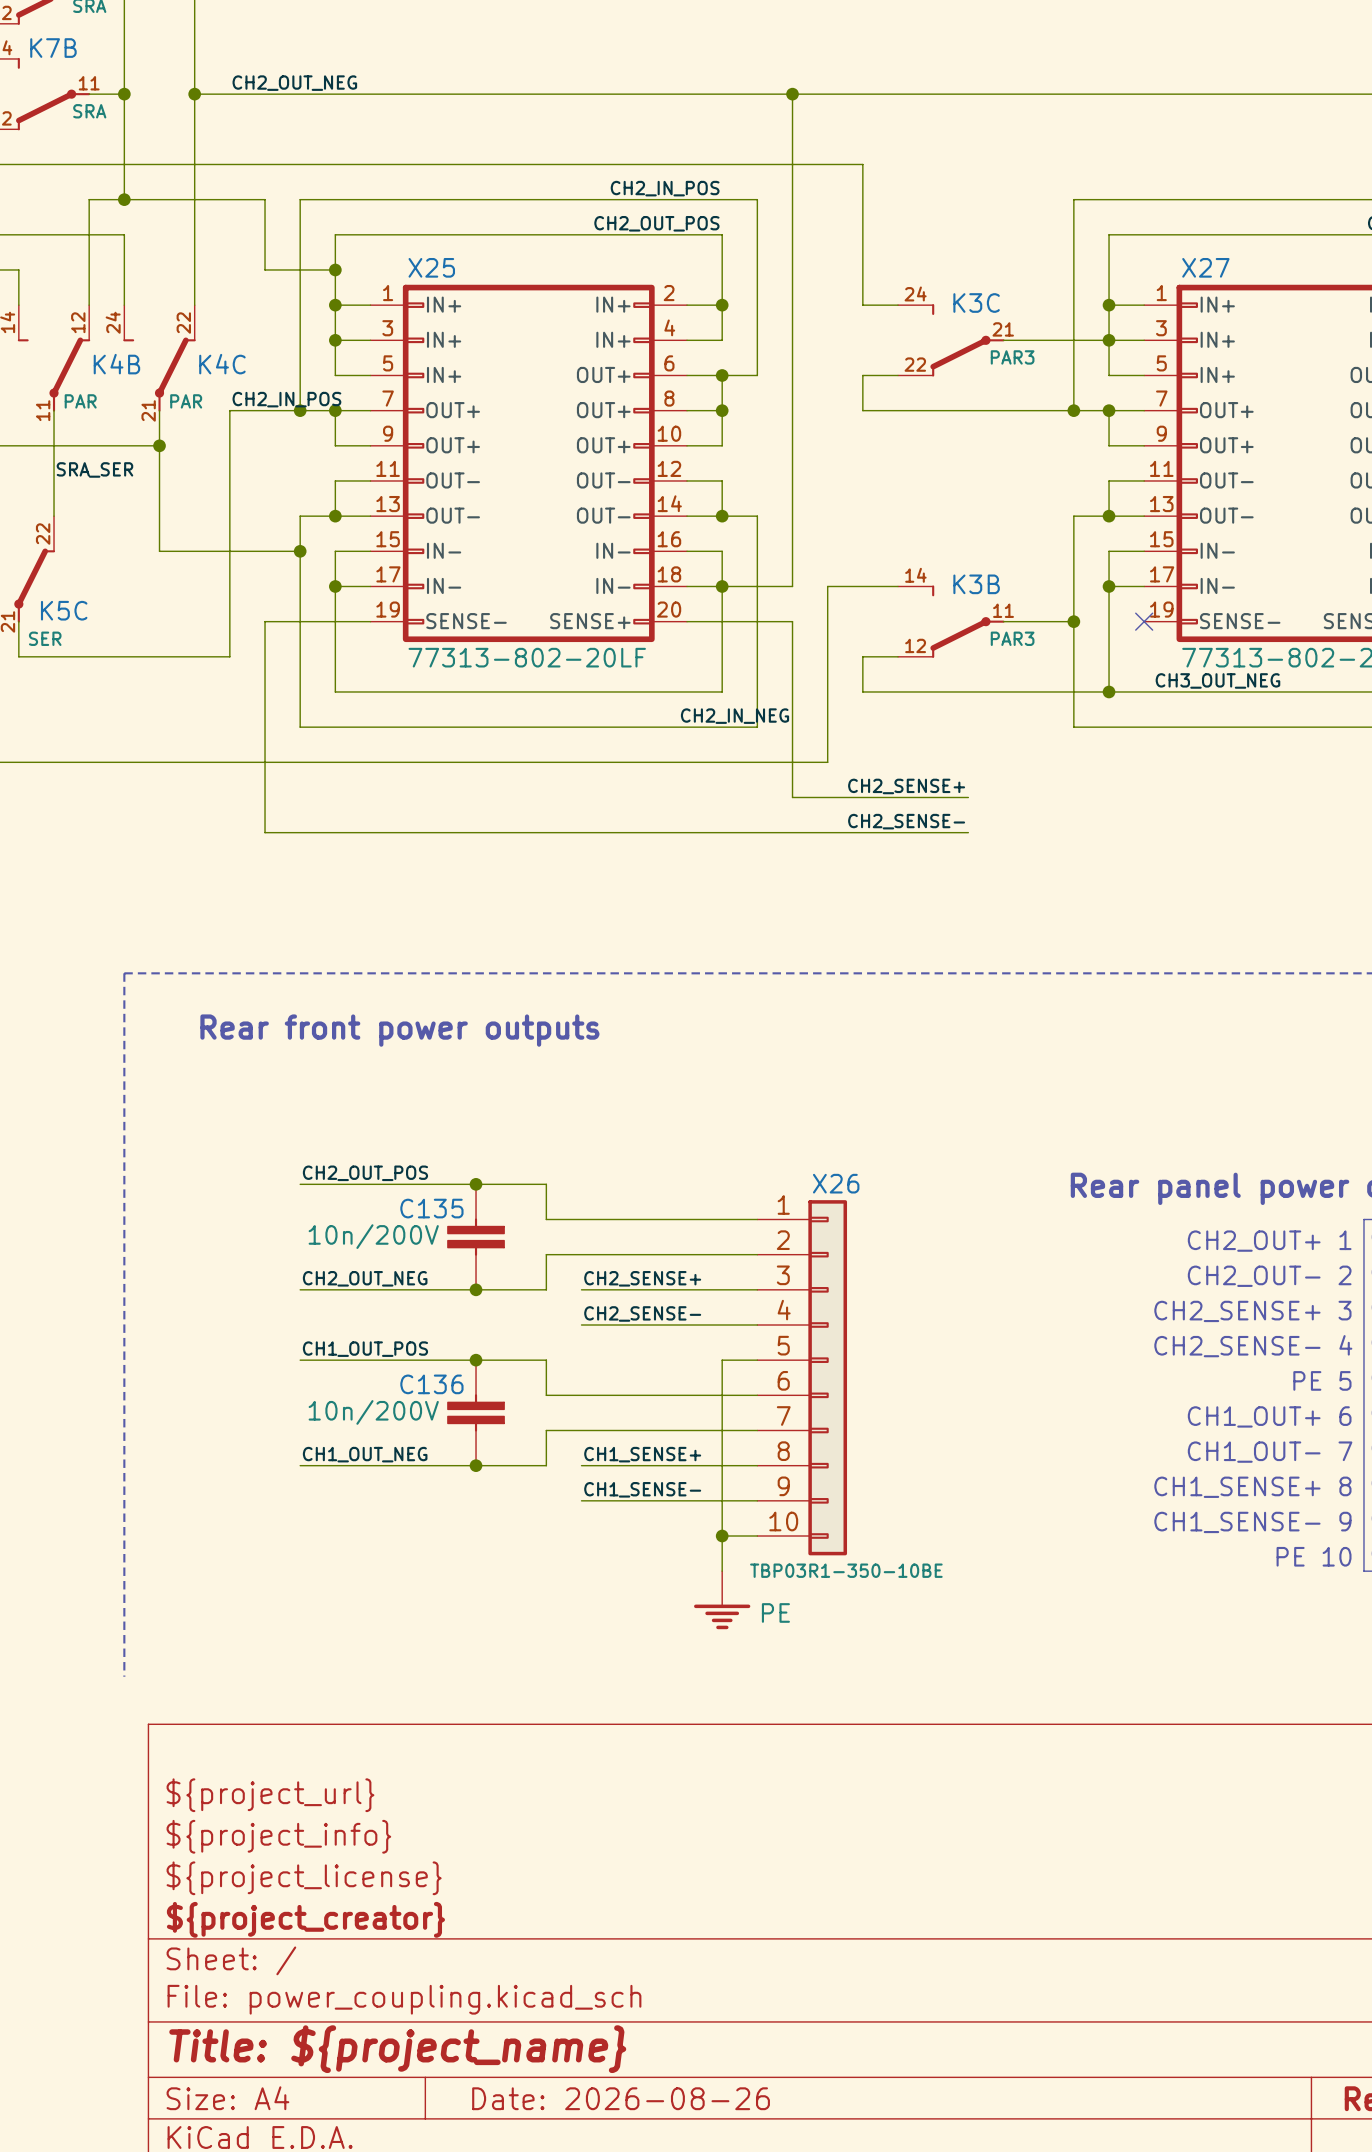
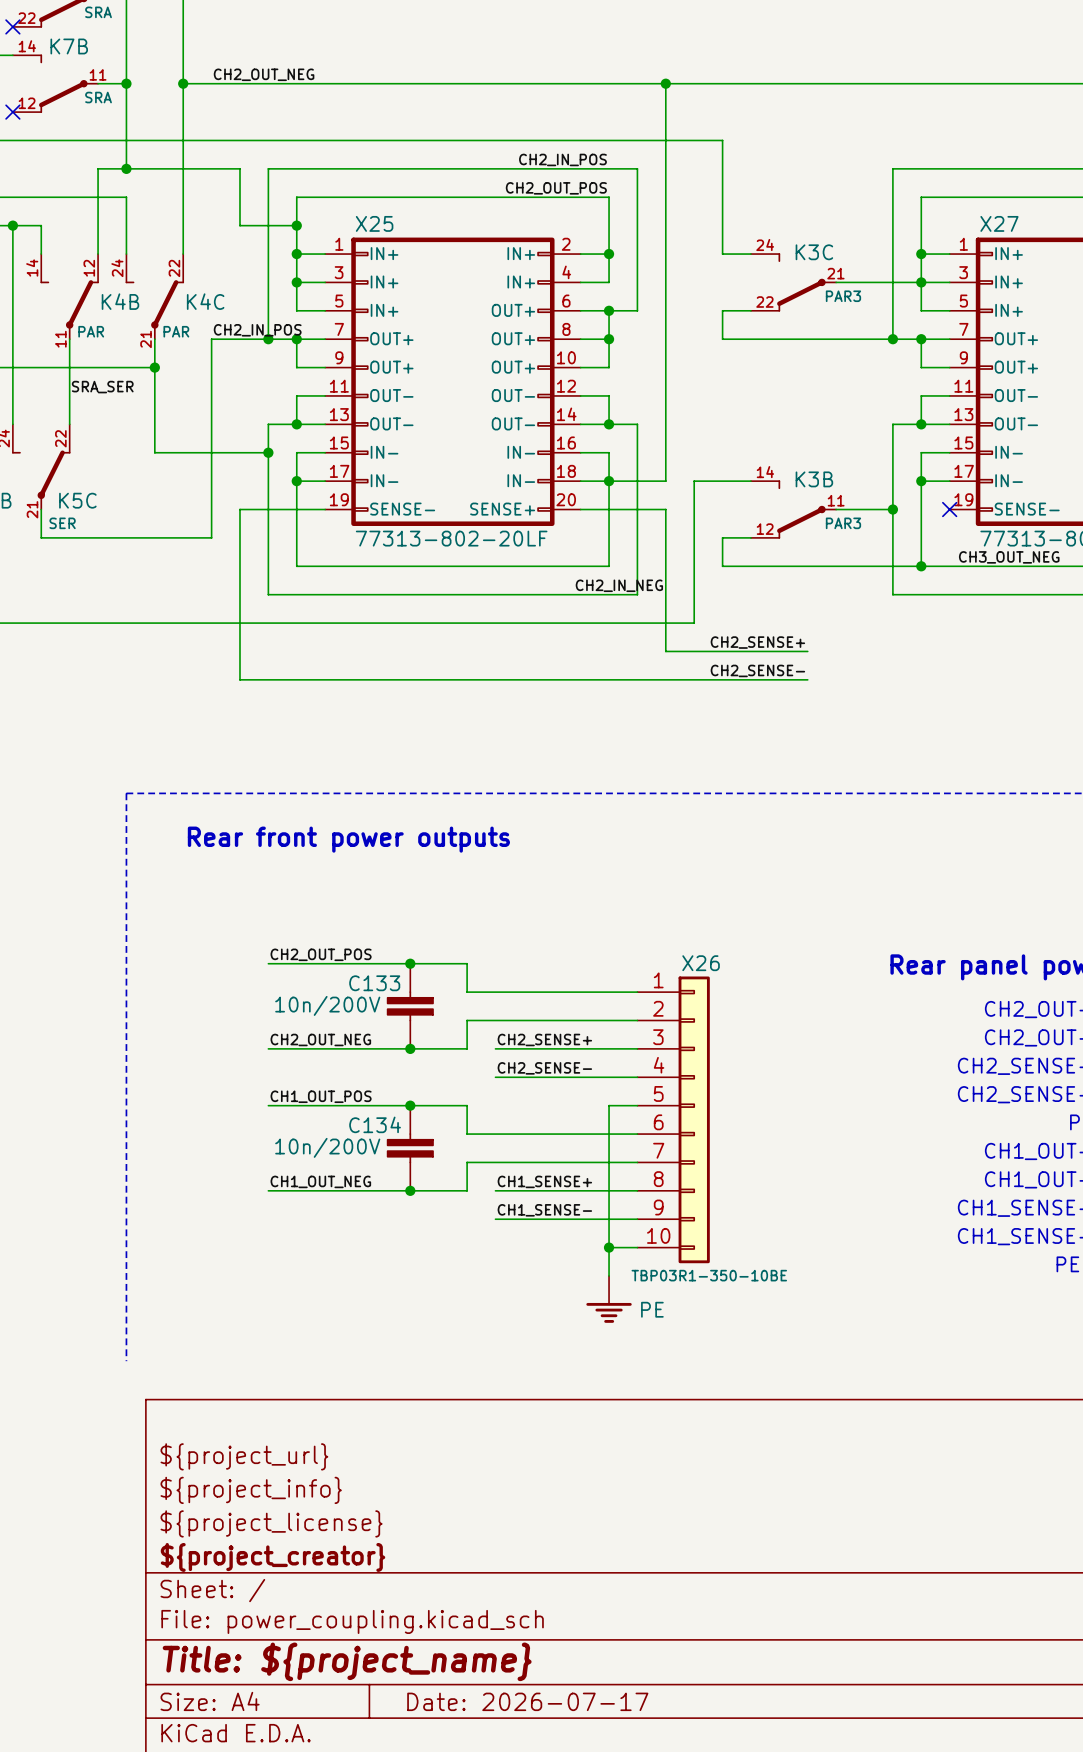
C135 name: C135 (431, 1208) -> C133 (374, 983)
C136 name: C136 (431, 1384) -> C134 (375, 1124)
title block: Date: 2026-08-26 (621, 2098) -> Date: 2026-07-17 (527, 1701)

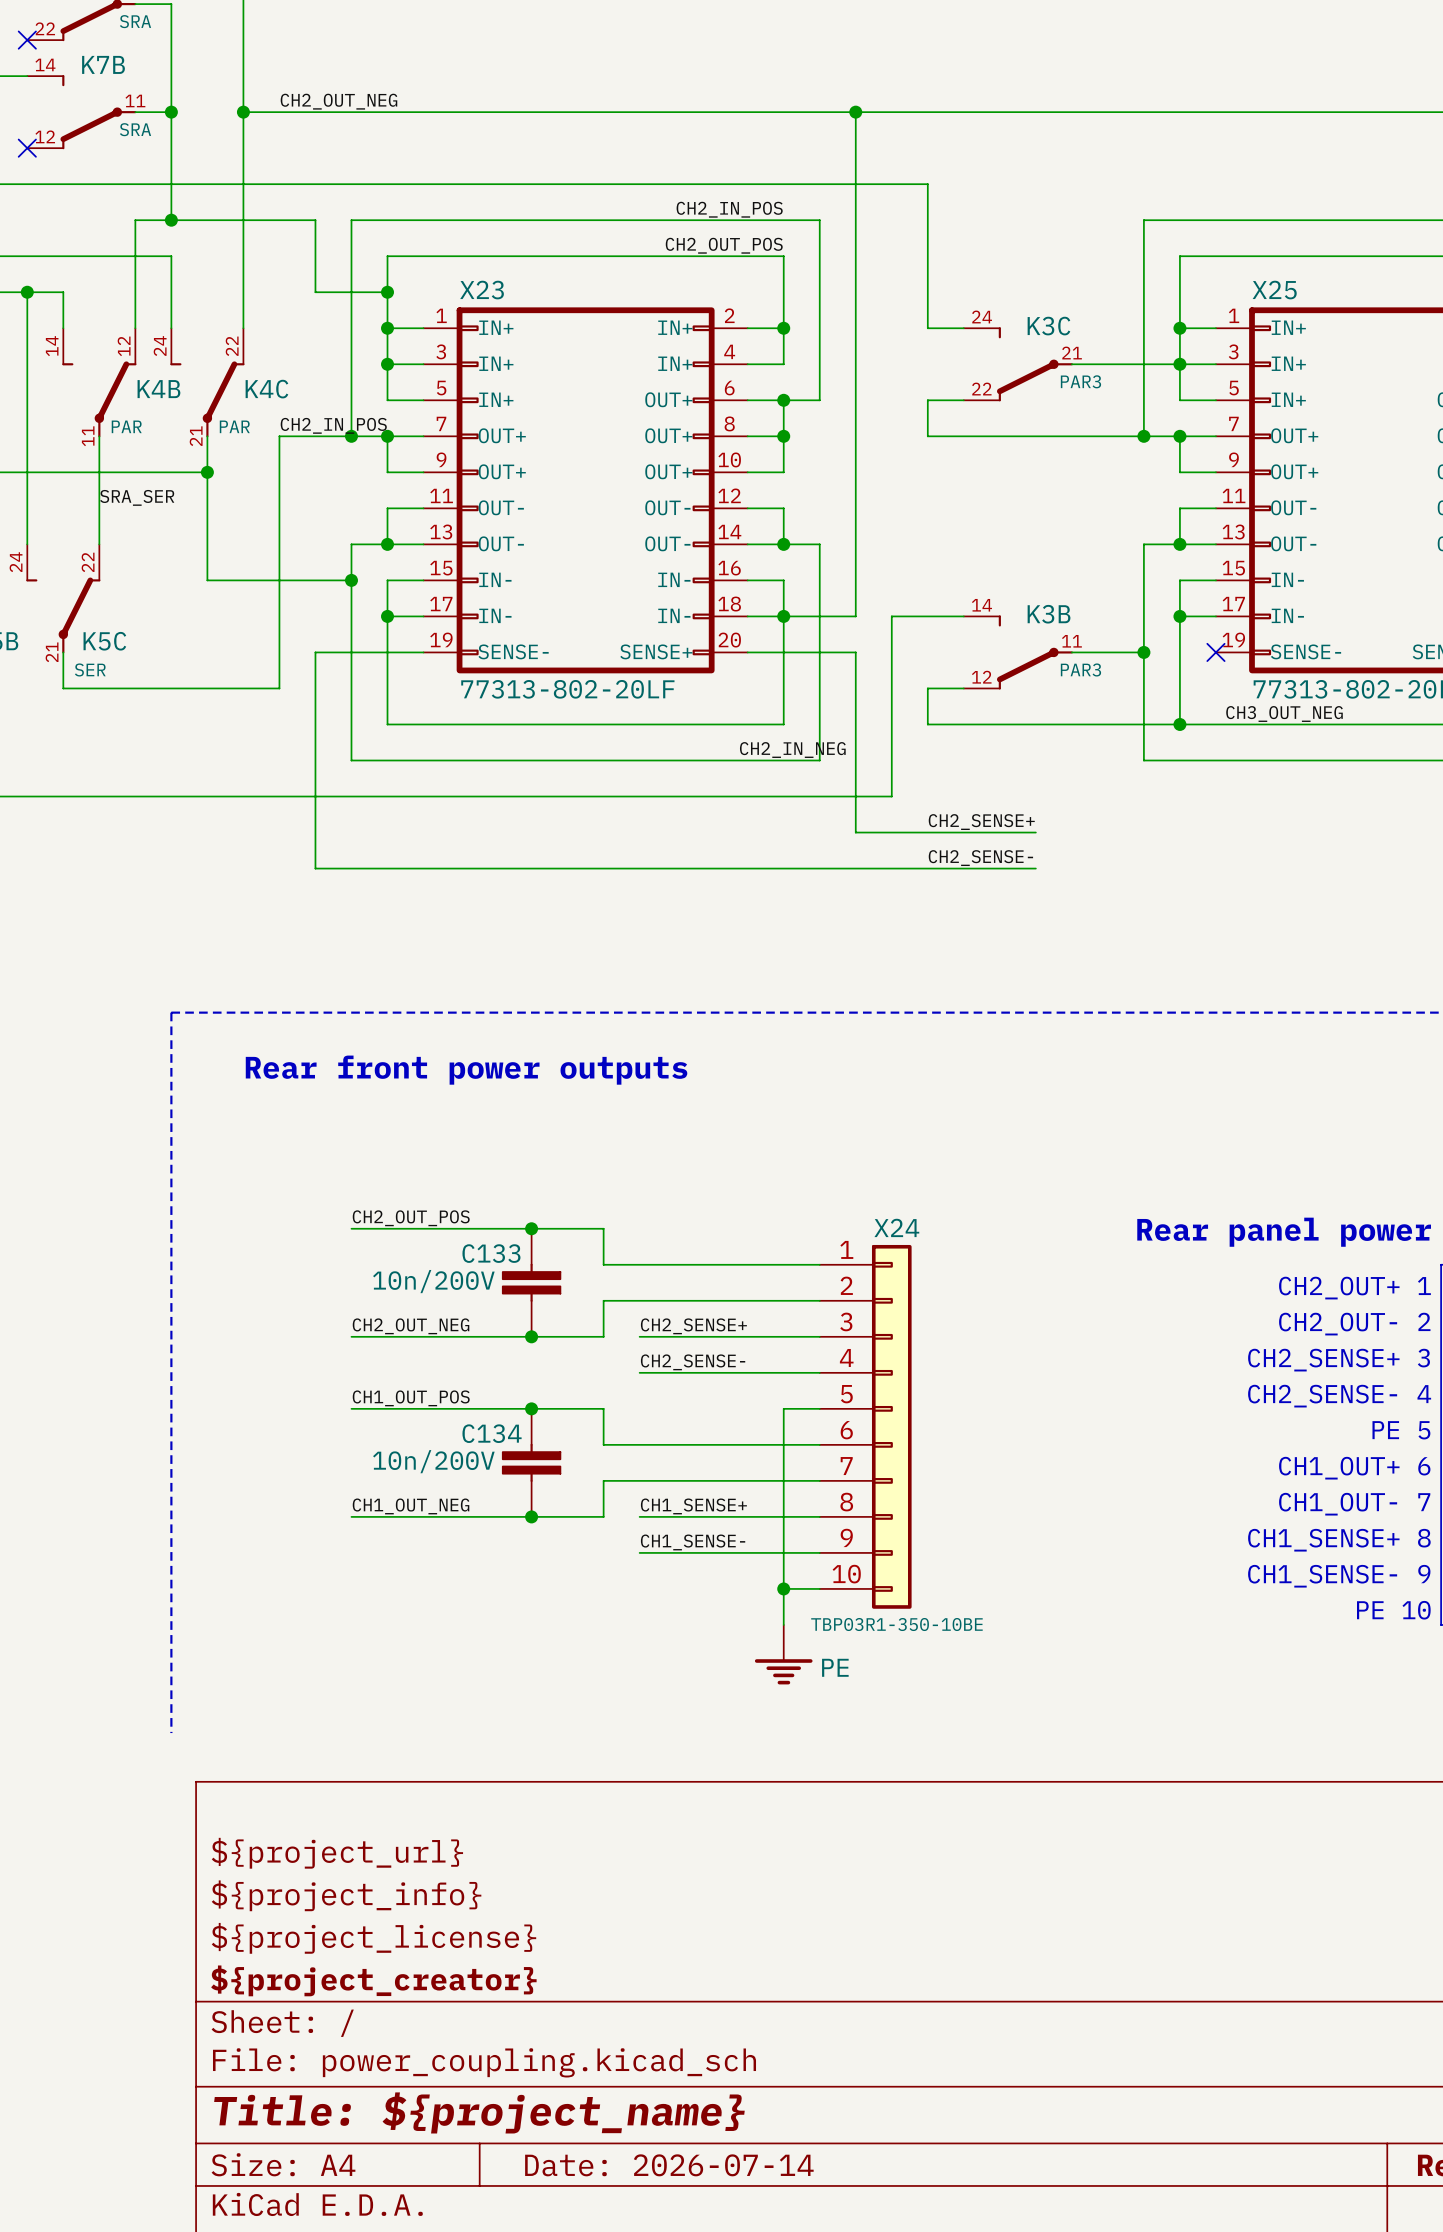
X25 name: X25 (374, 223) -> X23 (482, 290)
X27 name: X27 (999, 223) -> X25 (1274, 290)
X26 name: X26 (701, 963) -> X24 (896, 1227)
title block: Date: 2026-07-17 (527, 1701) -> Date: 2026-07-14 (669, 2165)

